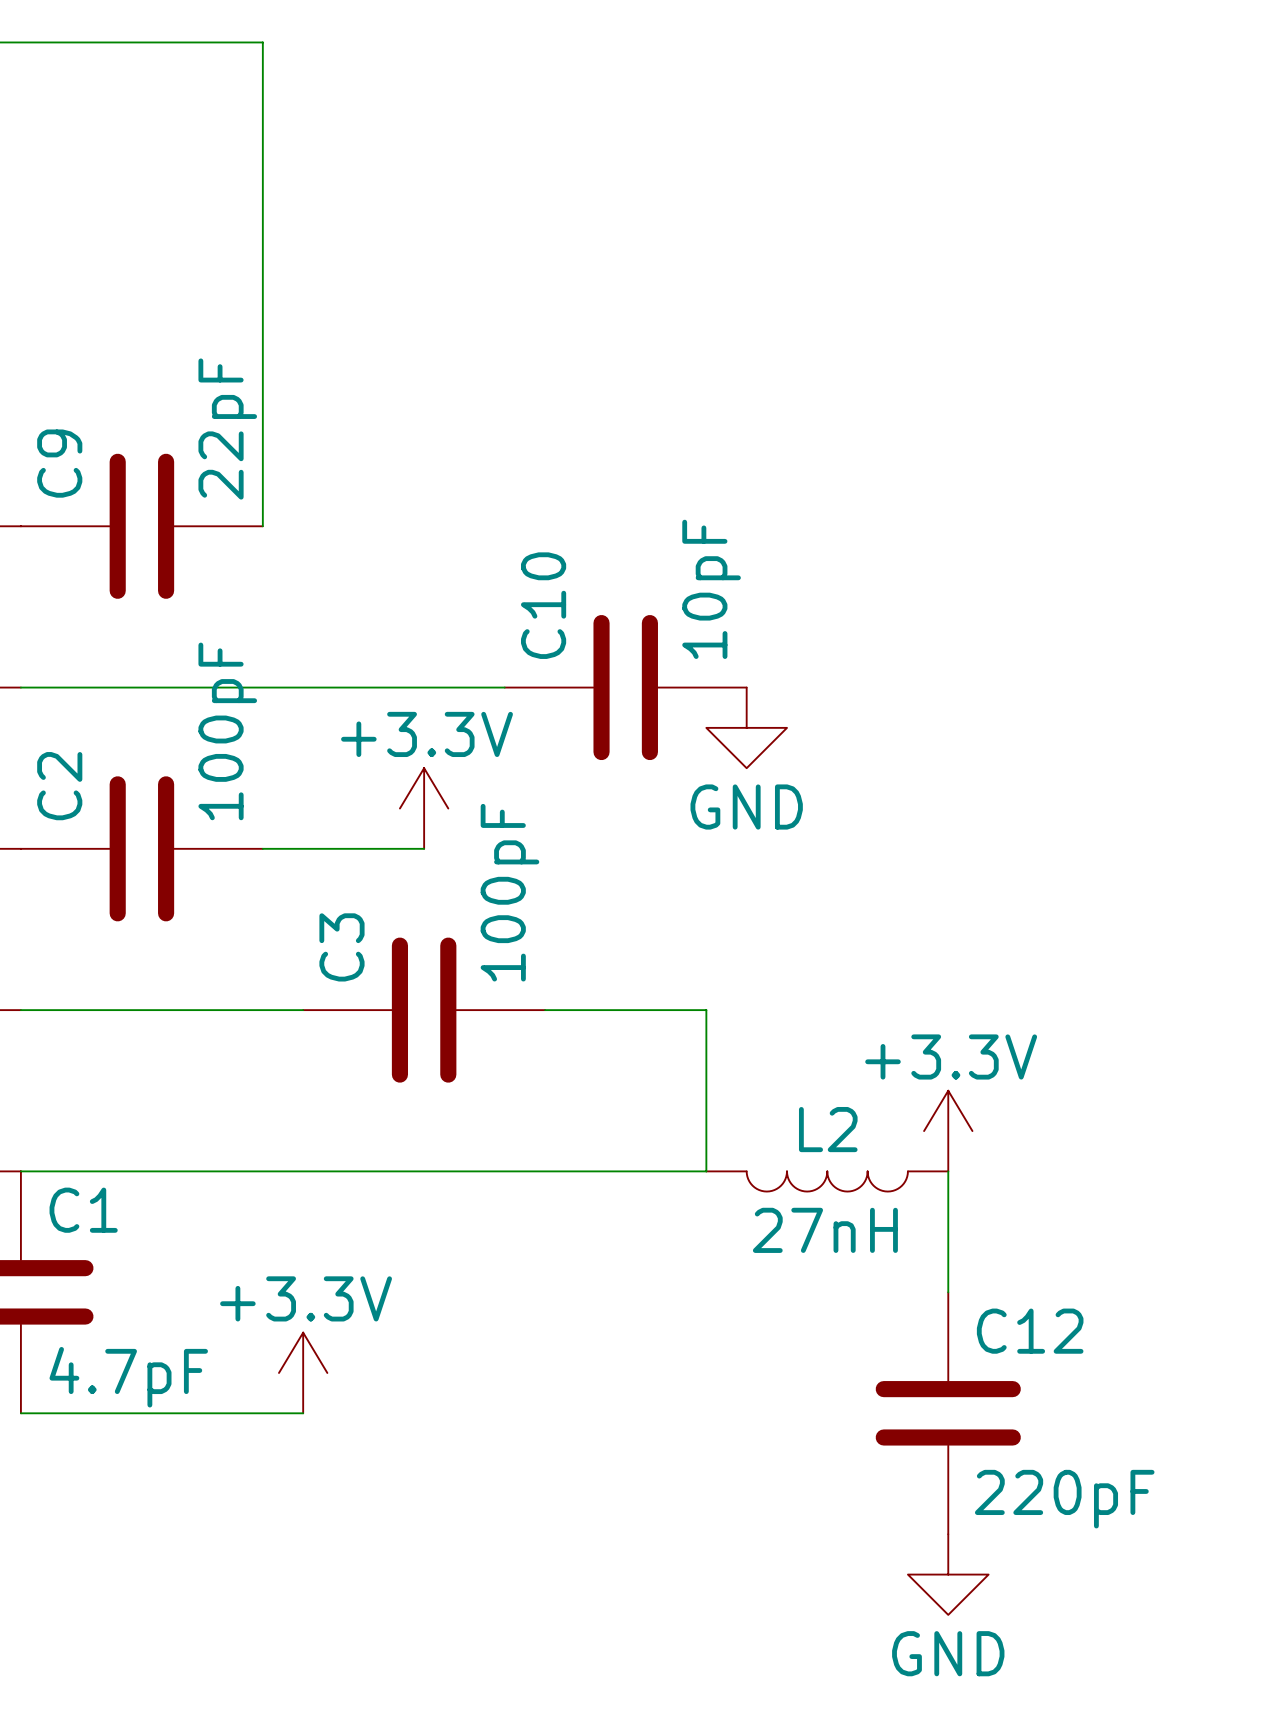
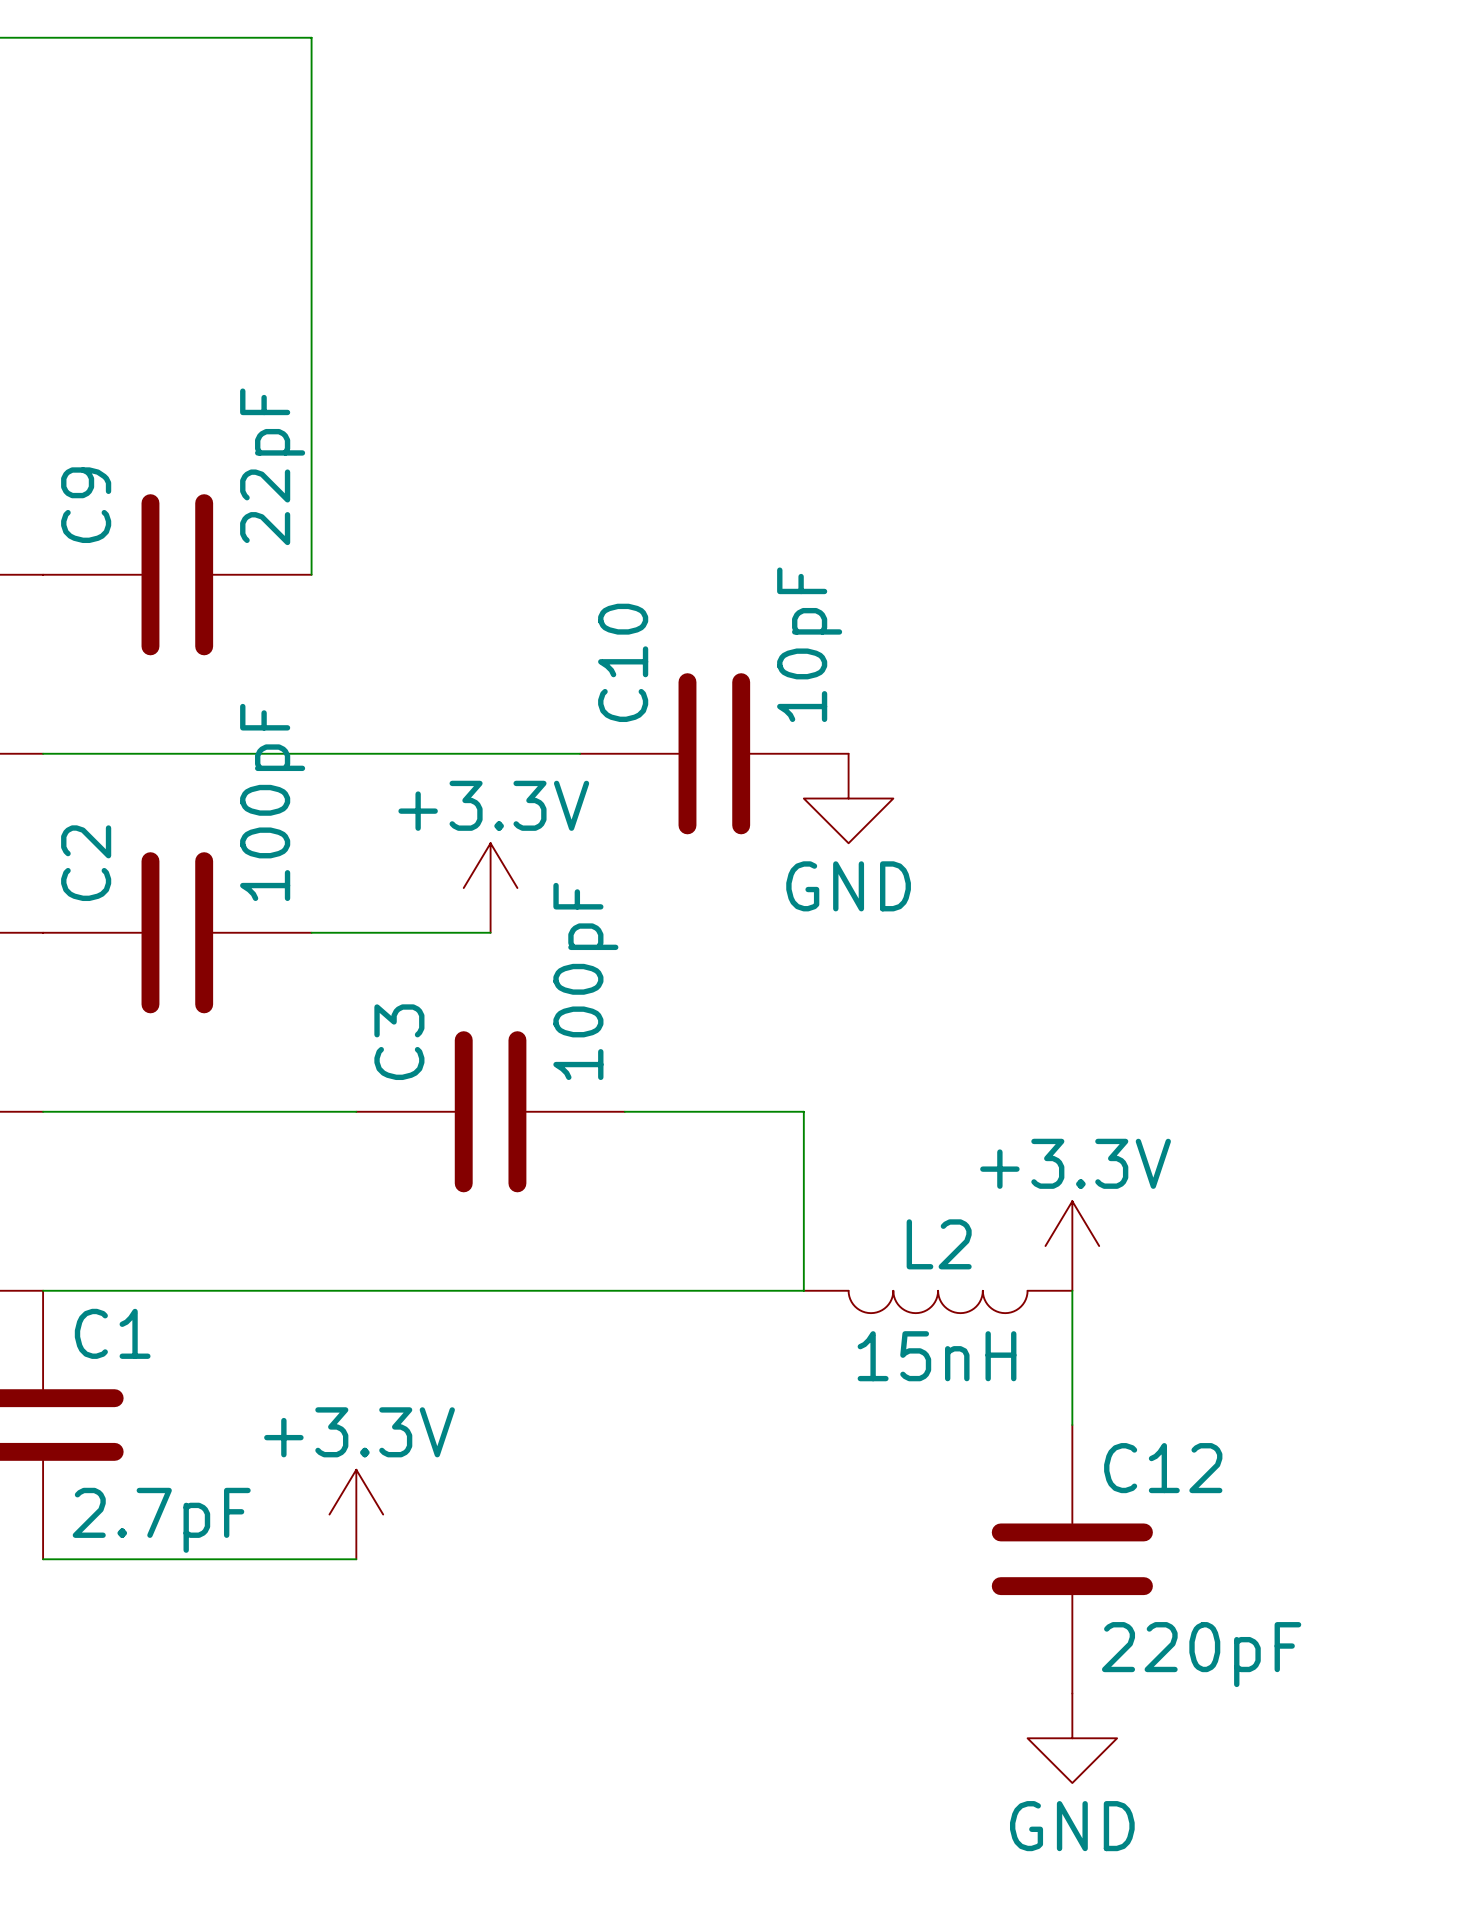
L2 value: 27nH (825, 1230) -> 15nH (937, 1356)
C1 value: 4.7pF (128, 1377) -> 2.7pF (161, 1520)

